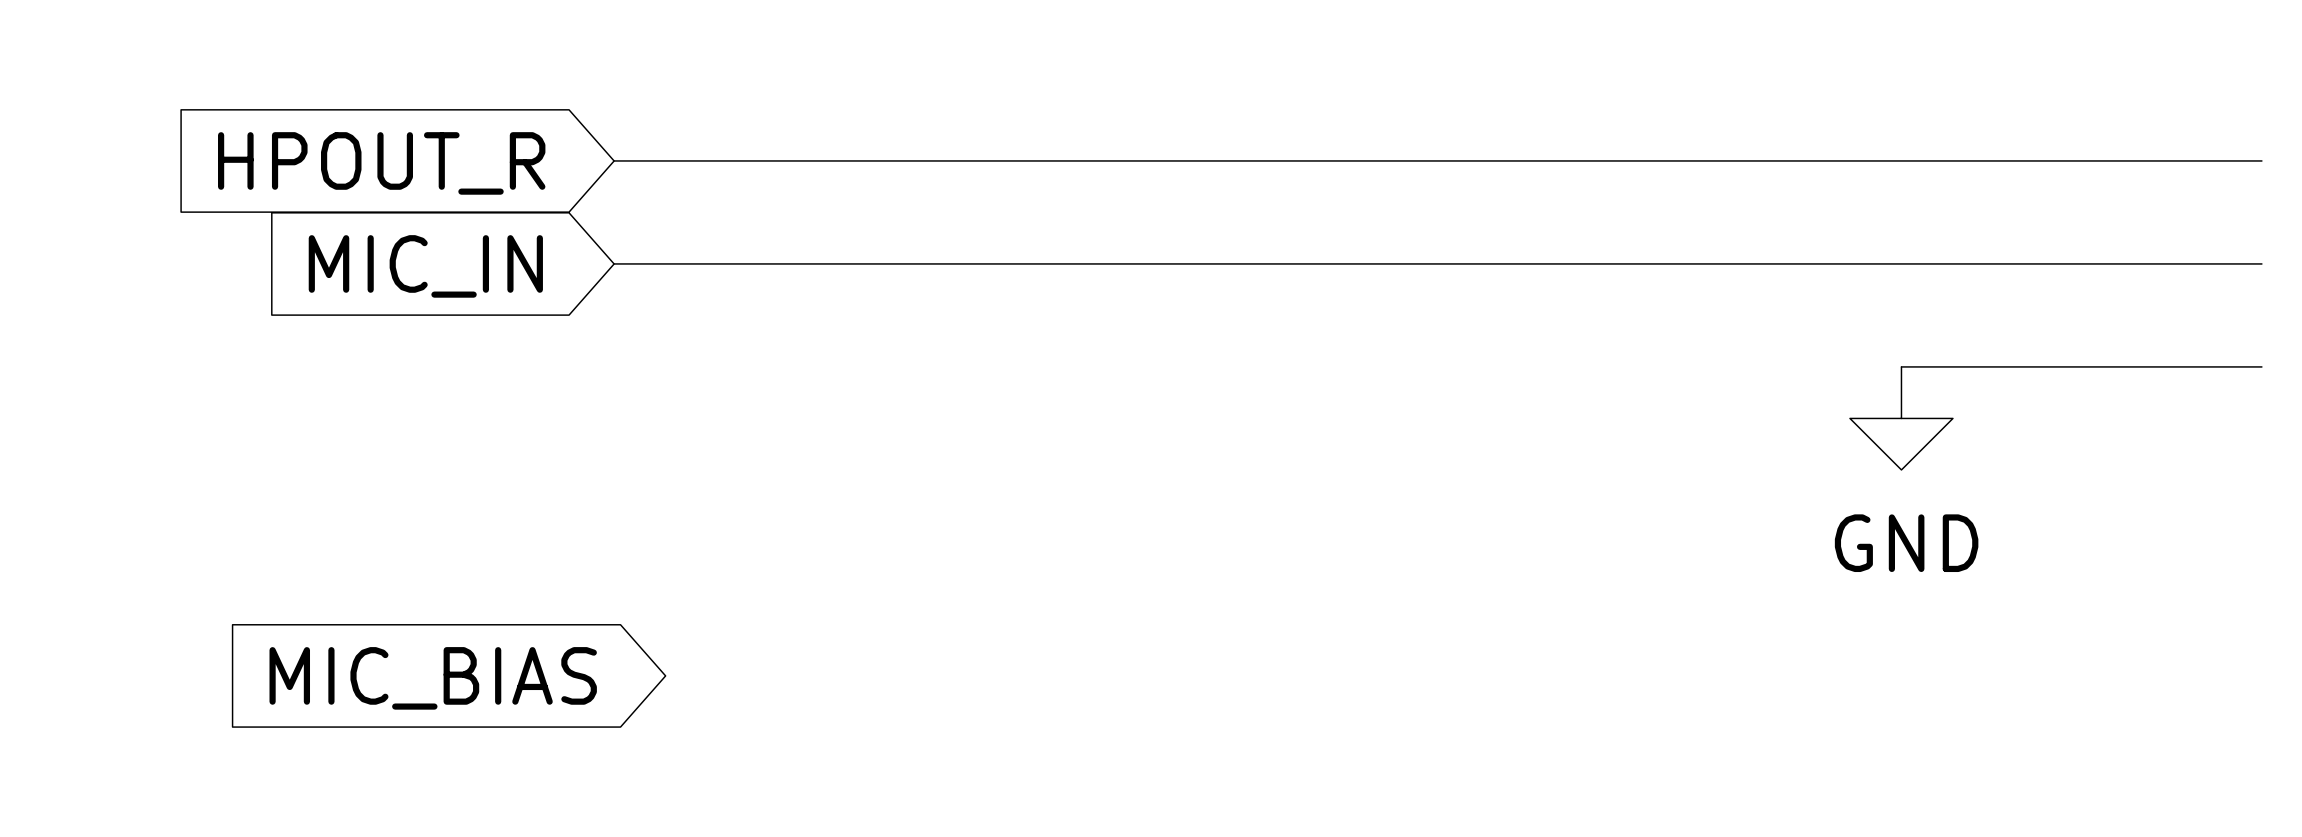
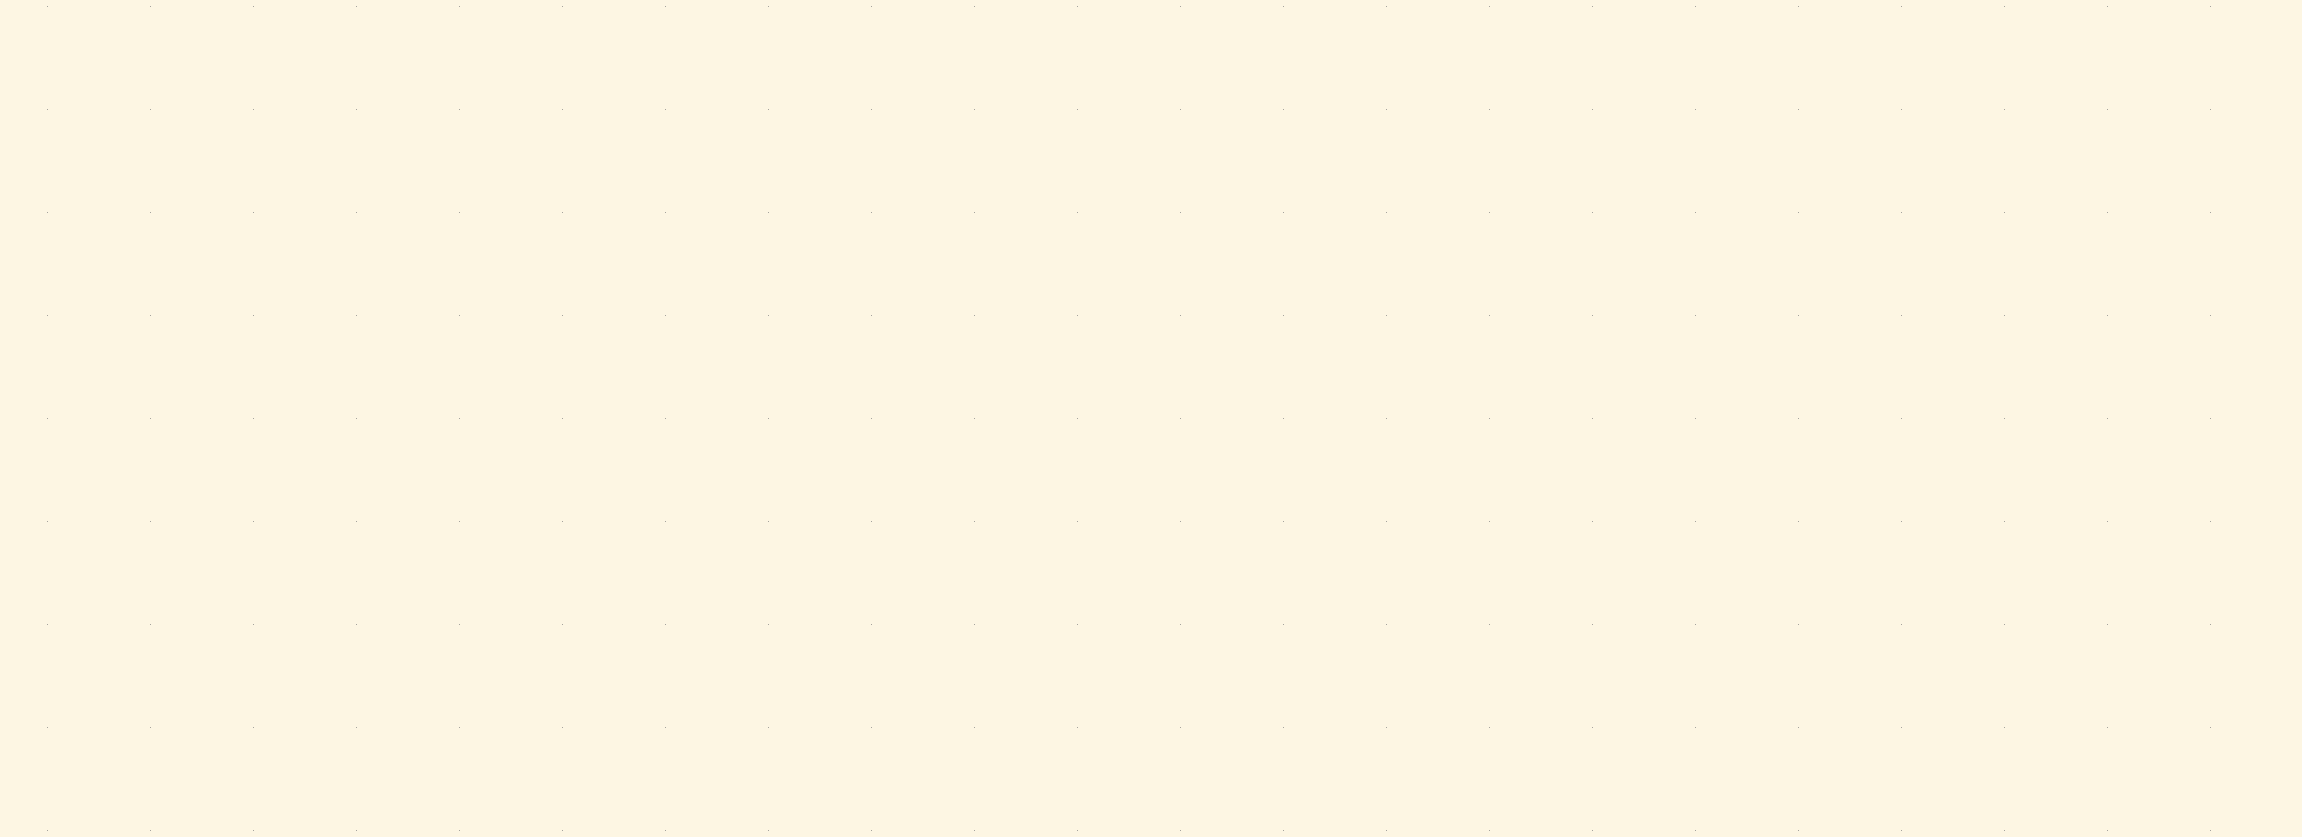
wire: (614, 160) (2261, 160) -> none
global label: HPOUT_R (381, 163) -> none
wire: (614, 263) (2261, 263) -> none
global label: MIC_IN (425, 266) -> none
wire: (1901, 366) (2261, 366) -> none
power symbol: GND (1901, 418) -> none
global label: MIC_BIAS (433, 678) -> none

